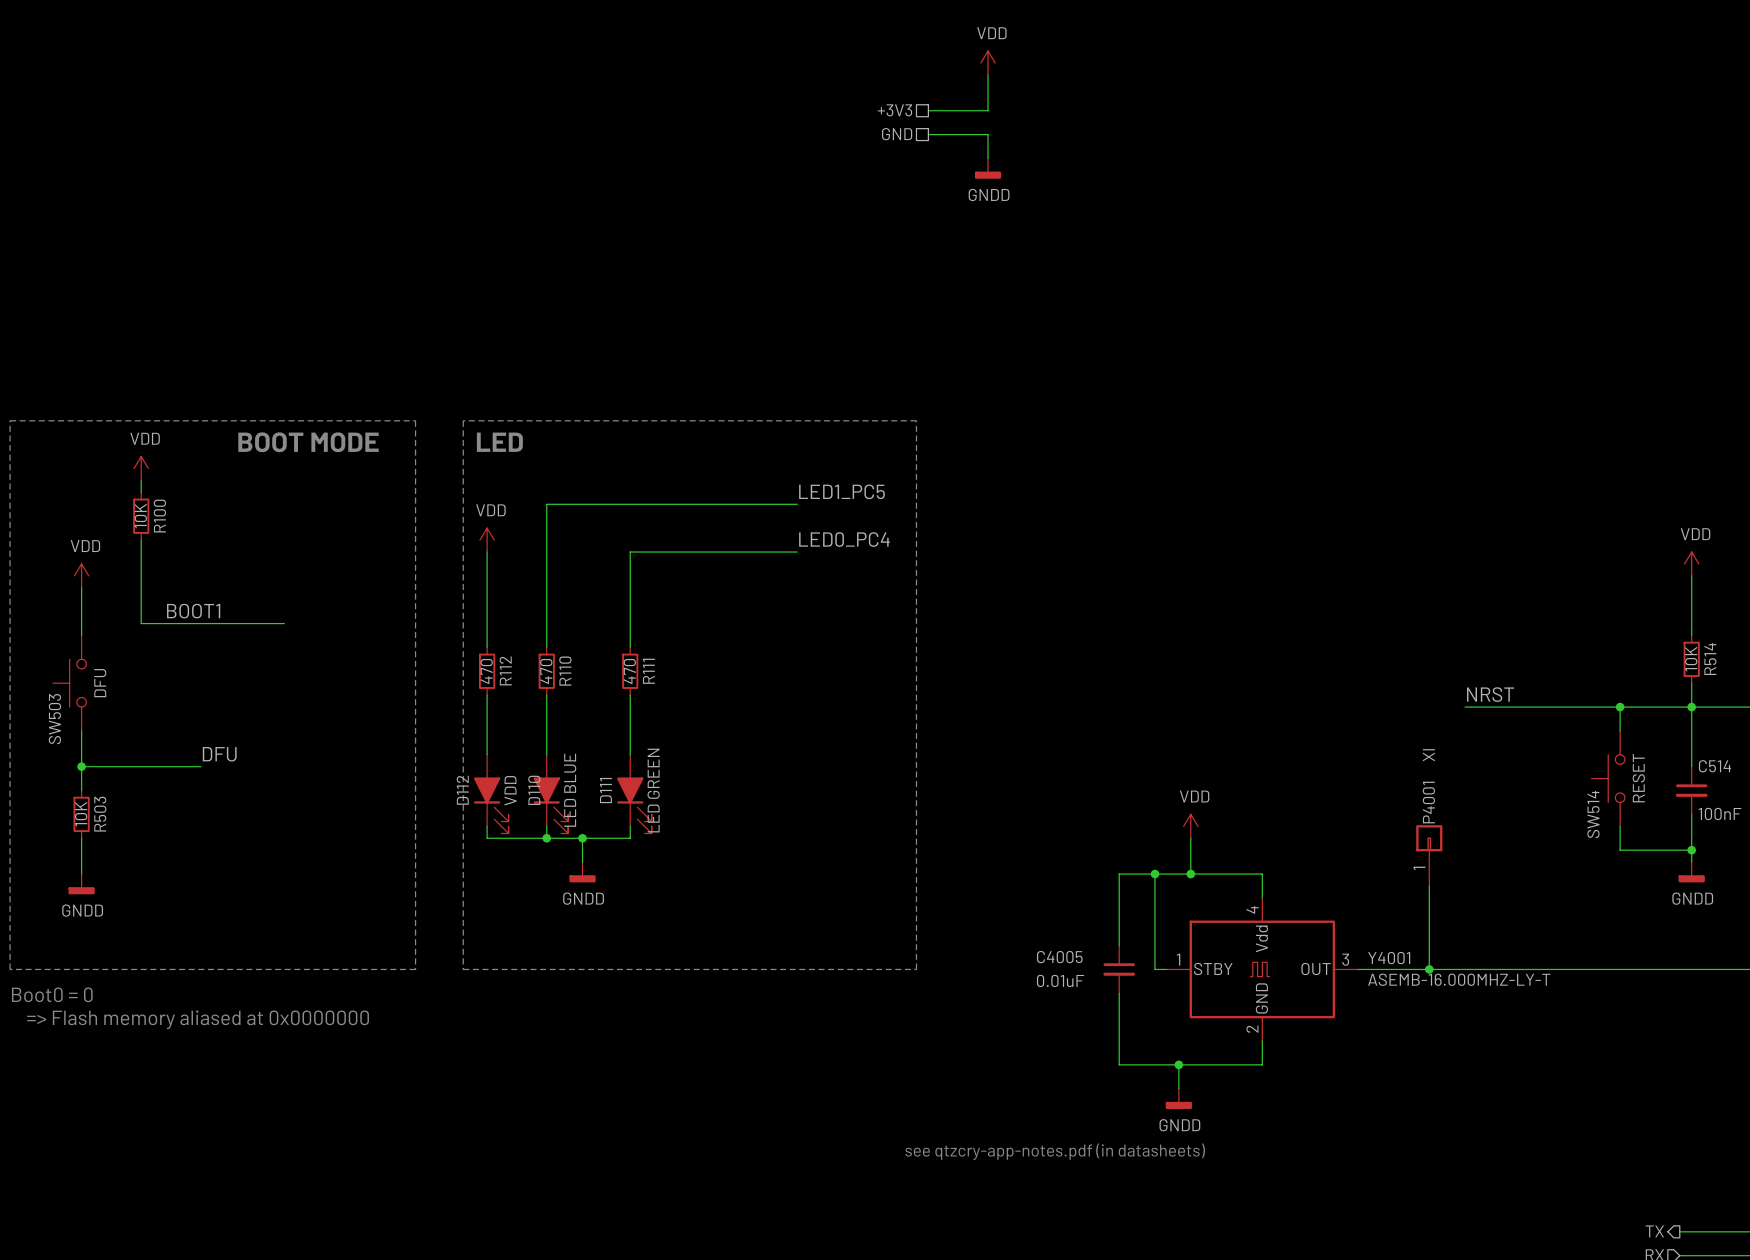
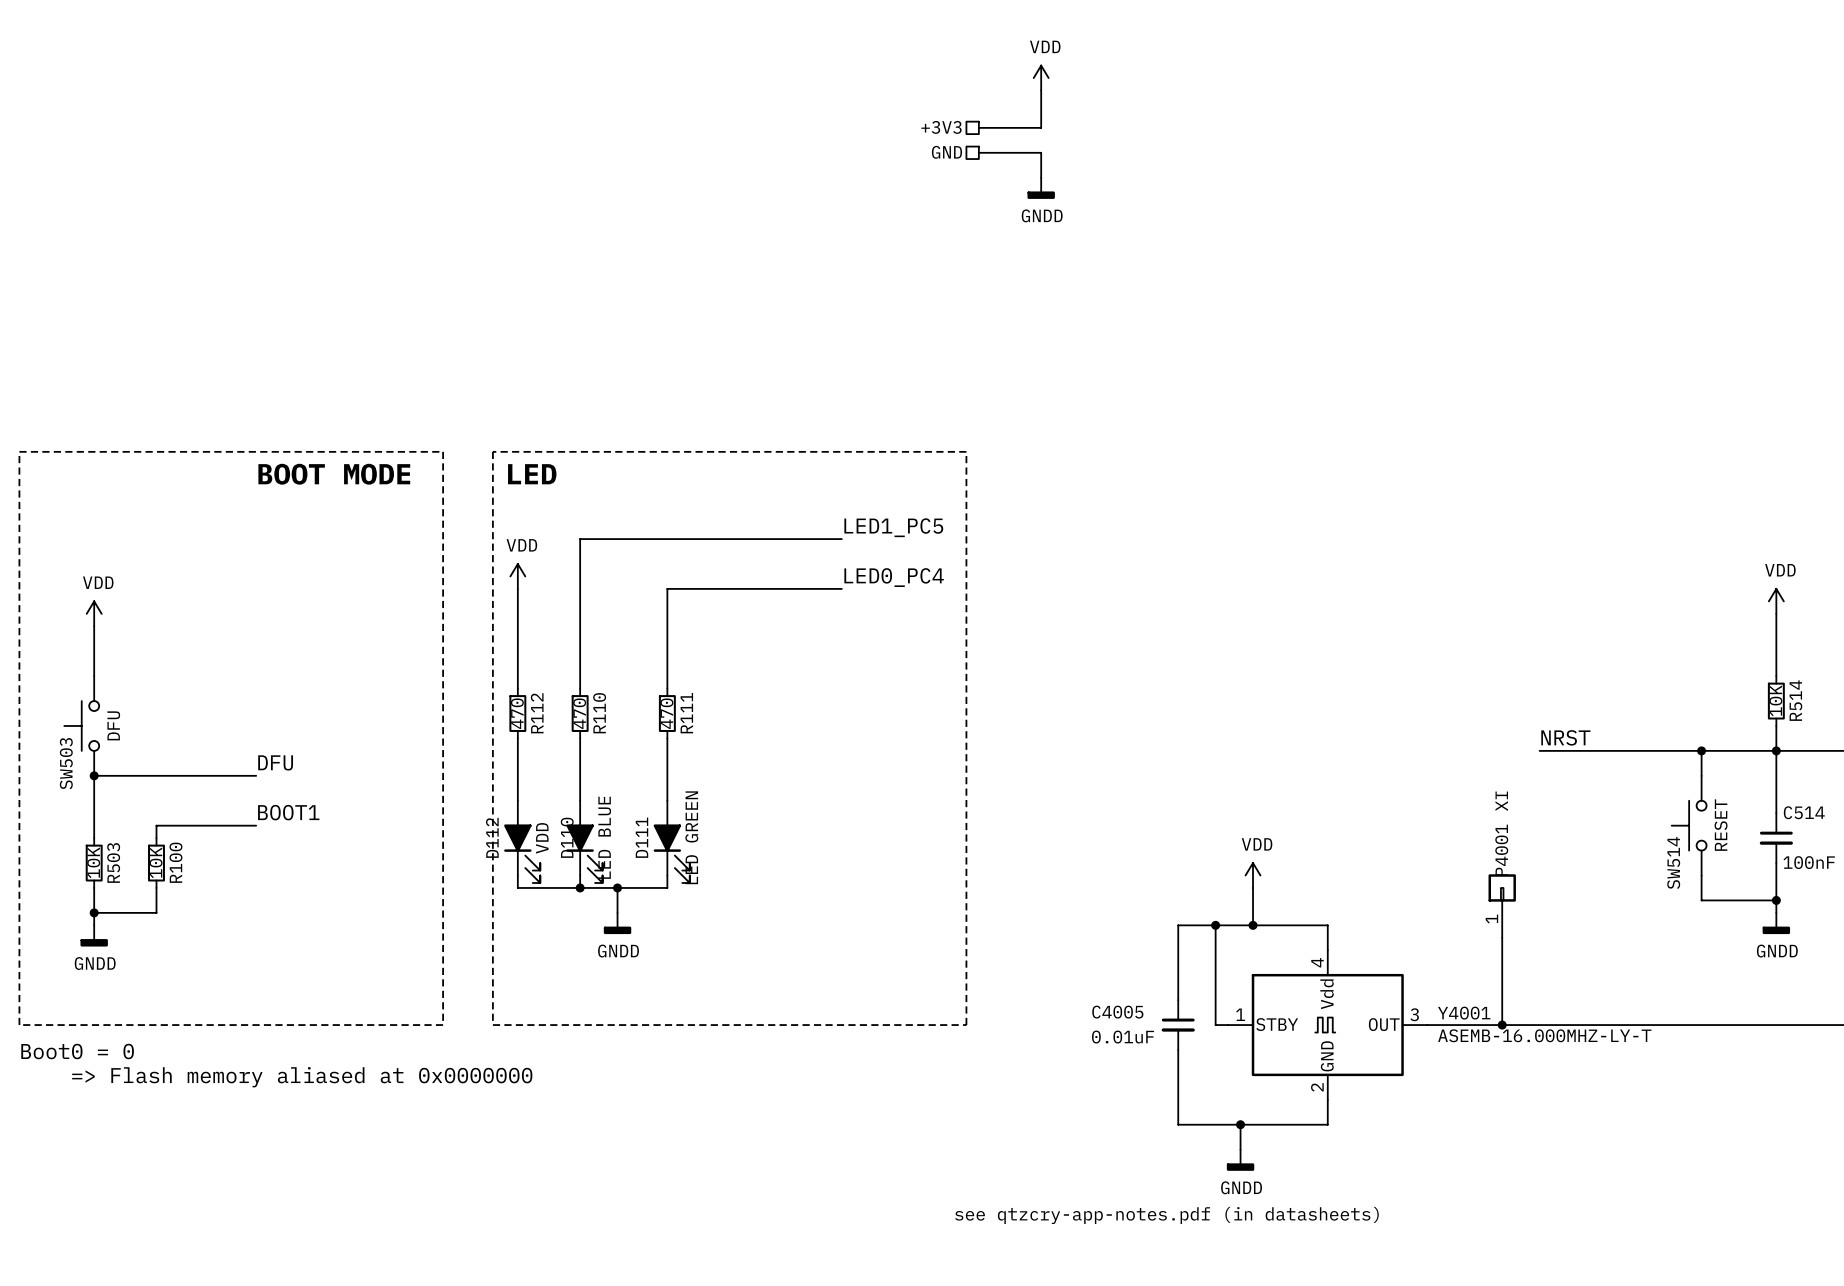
power symbol: VDD (141, 468) -> none
wire: (141, 480) (141, 492) -> none
R100 position: (141, 516) -> (156, 863)
wire: (141, 540) (141, 623) (284, 623) -> none
label position: BOOT1 (193, 611) -> BOOT1 (288, 812)
wire: none -> (94, 775) (256, 775)
label position: DFU (219, 754) -> DFU (275, 762)
wire: (81, 766) (200, 766) -> none
junction position: (81, 766) -> (94, 775)
wire: none -> (256, 825) (156, 825) (156, 838)
wire: none -> (156, 887) (156, 912) (94, 912)
junction: none -> (94, 912)

